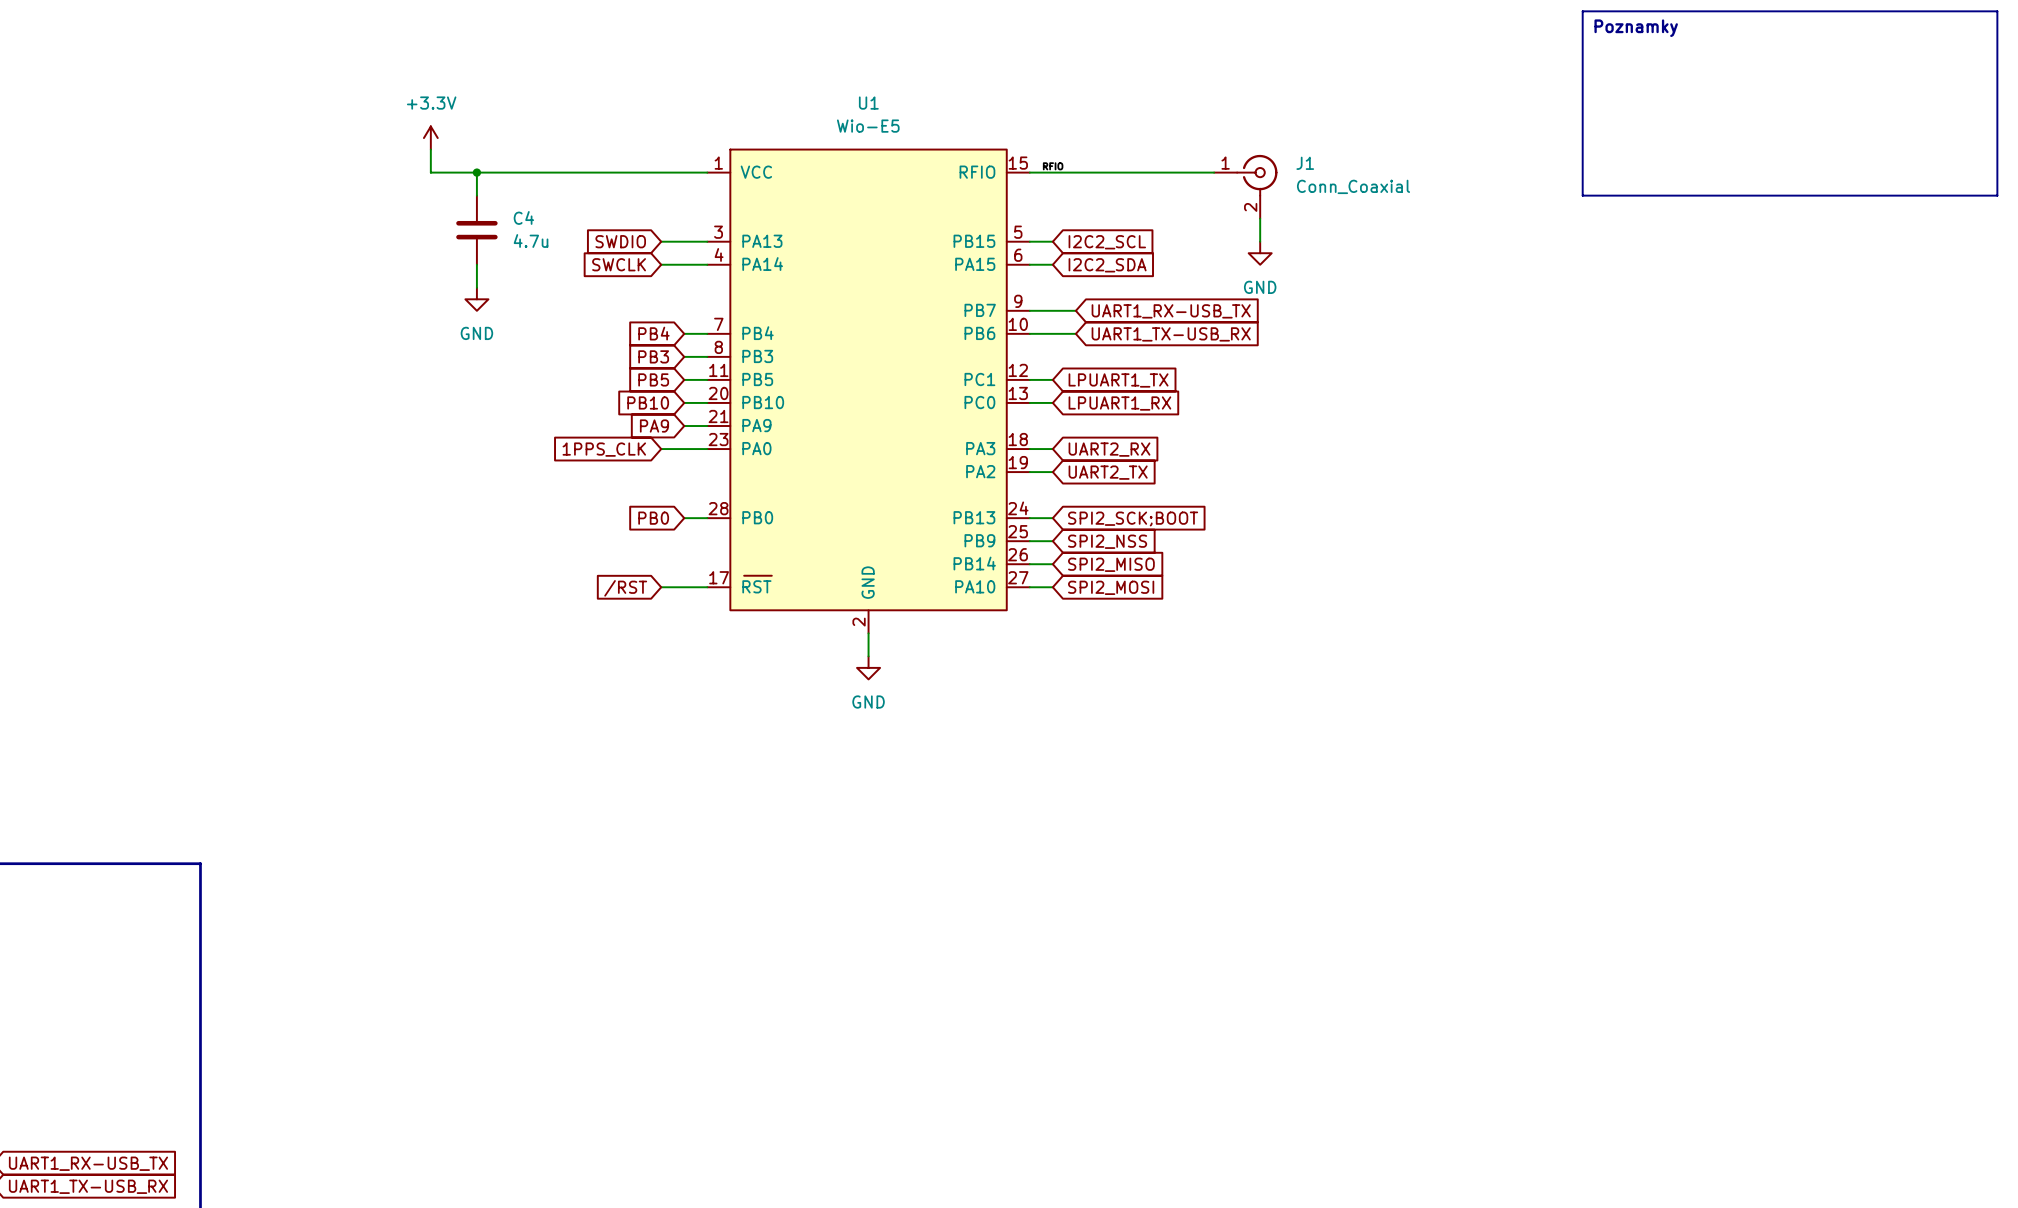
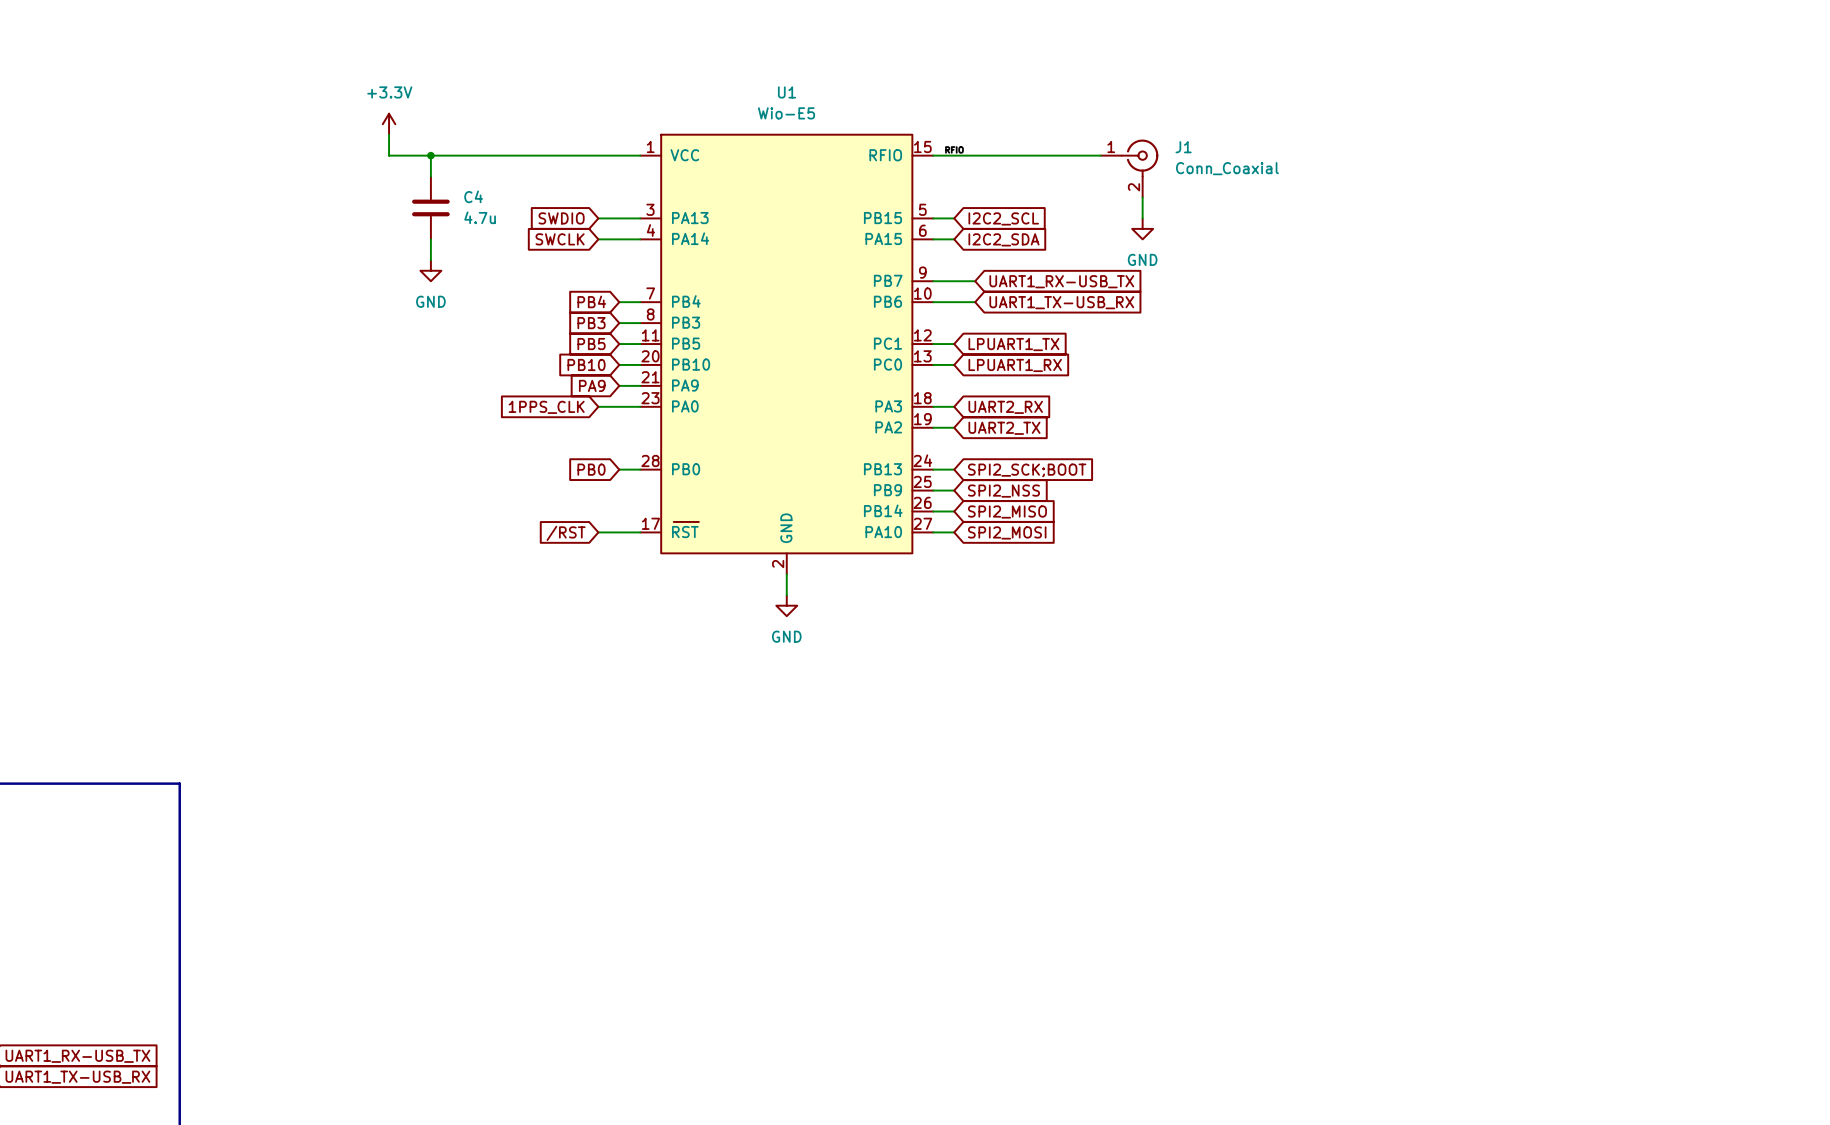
line: (1582, 11) (1997, 11) (1997, 195) (1582, 195) (1582, 11) -> none
text: Poznamky (1636, 28) -> none

